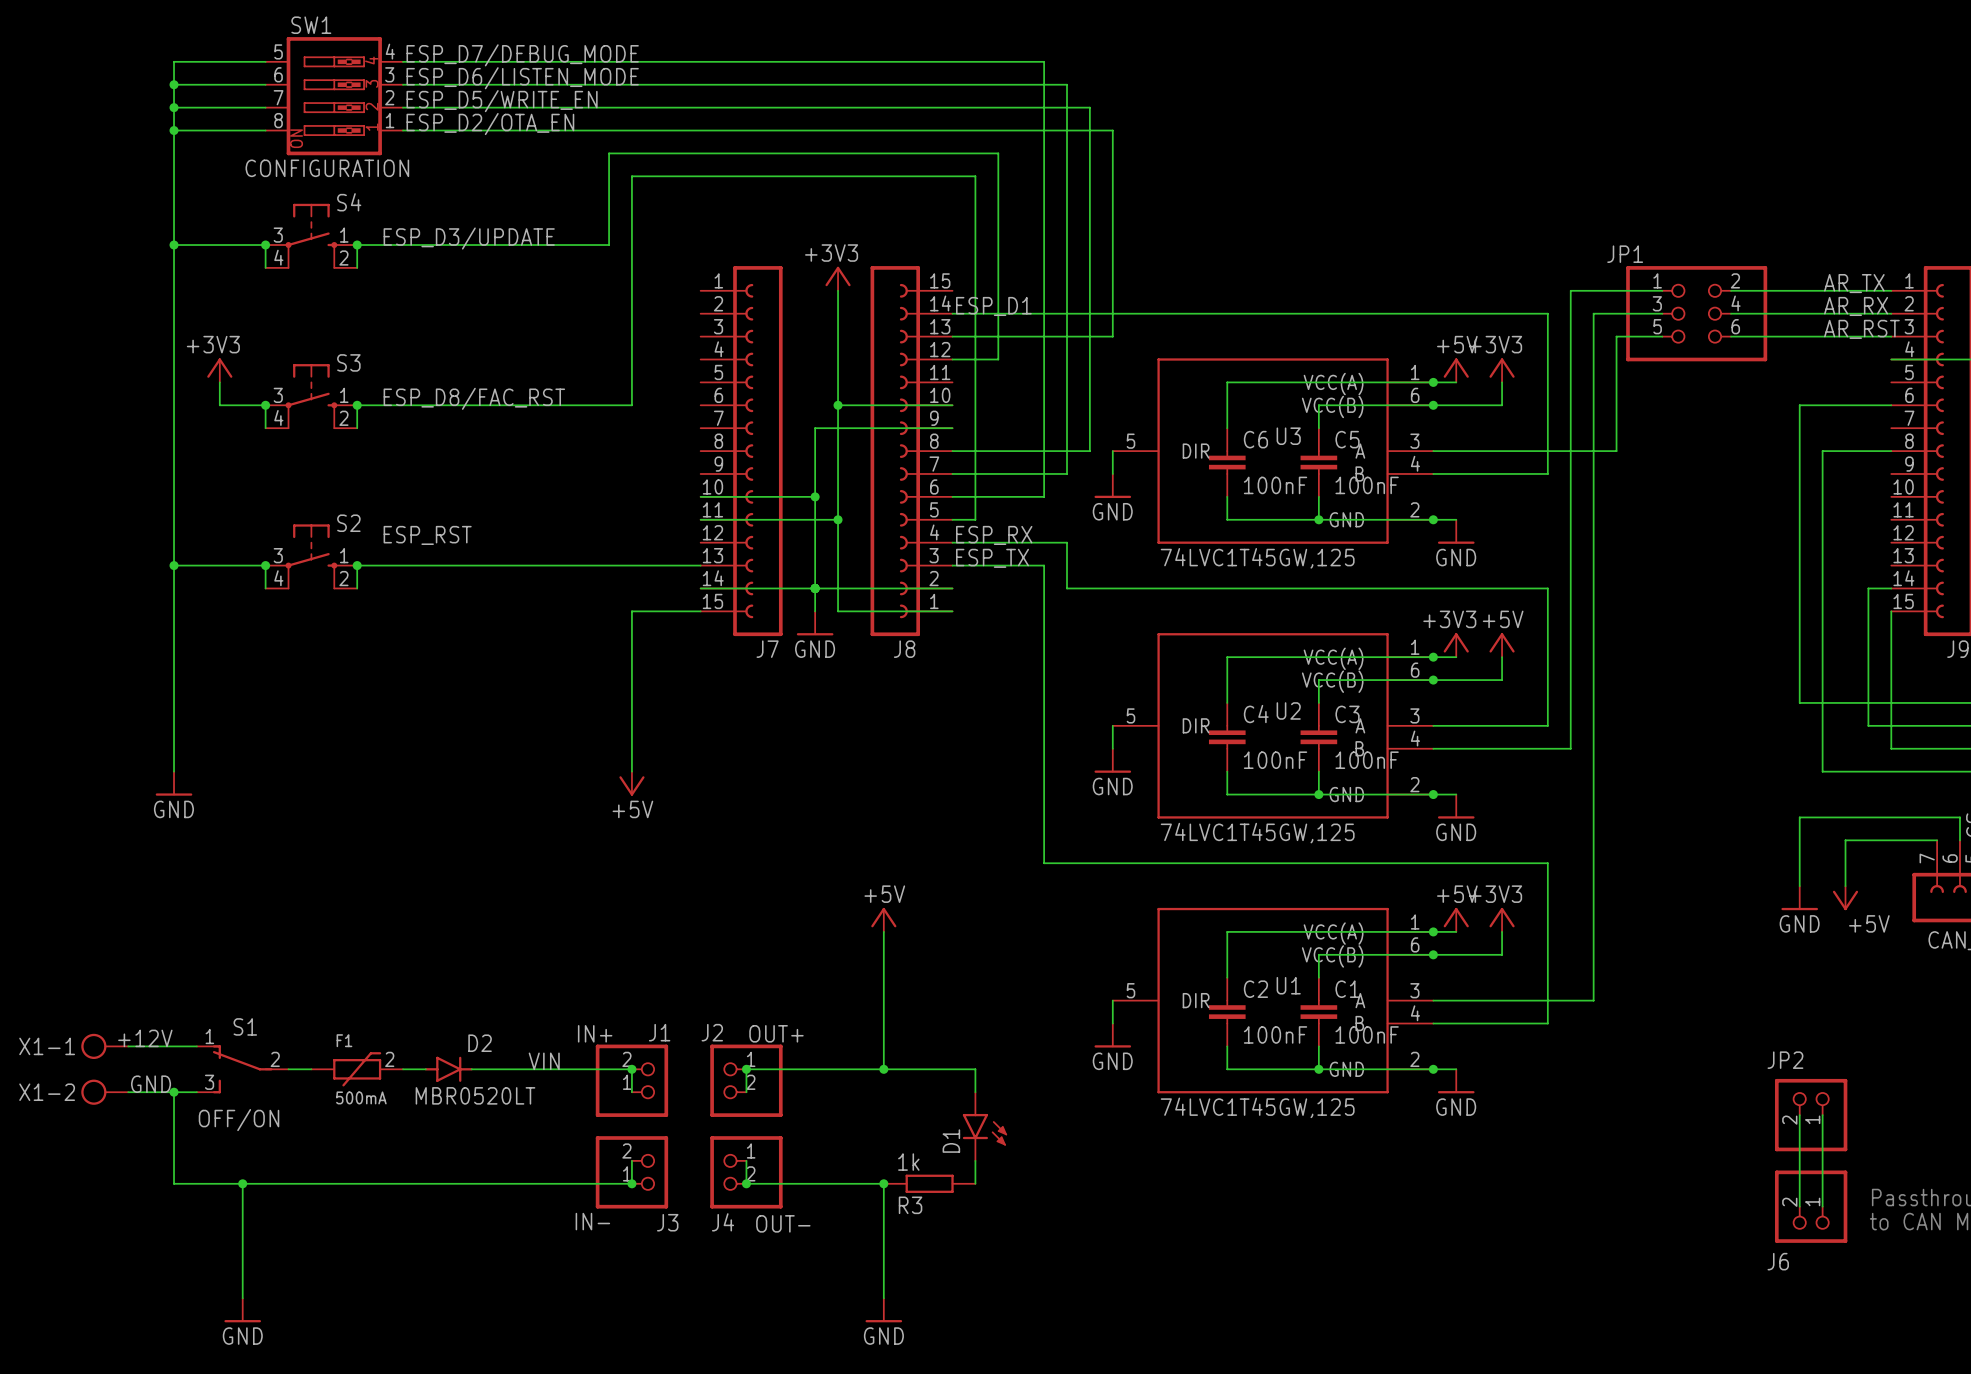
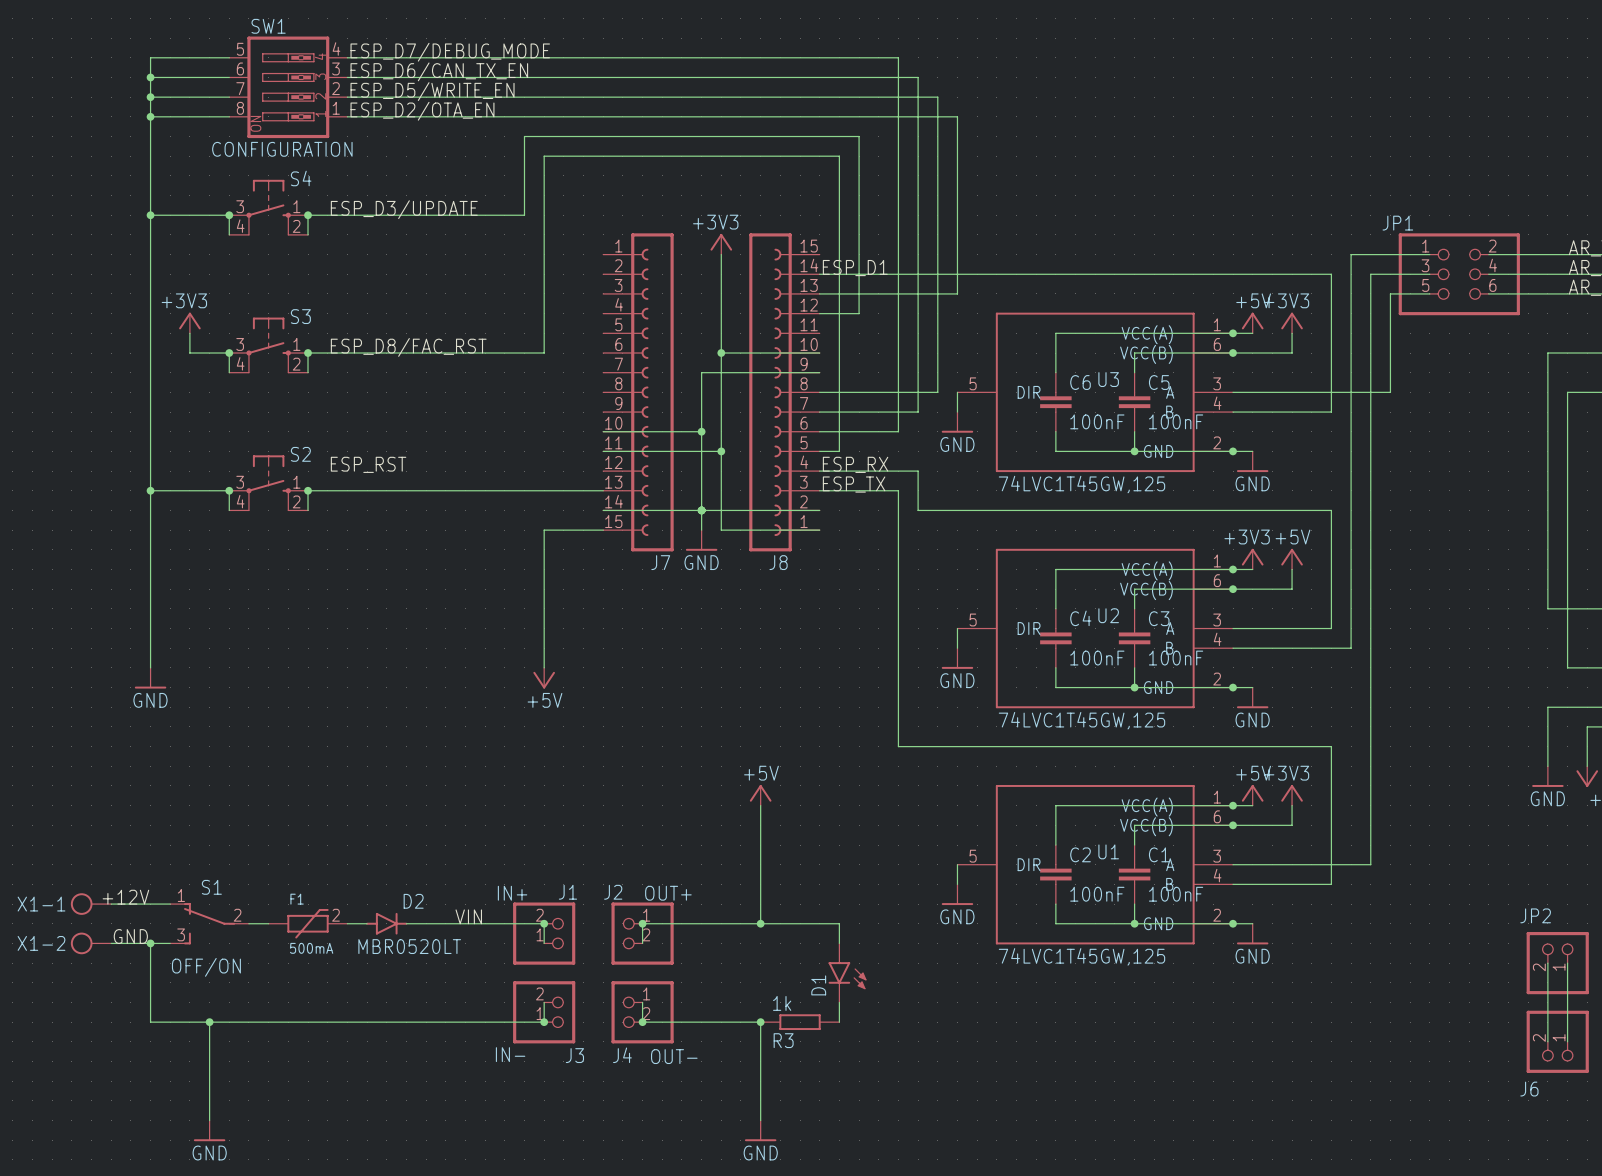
label: ESP_D6/LISTEN_MODE (522, 78) -> ESP_D6/CAN_TX_EN (439, 71)

